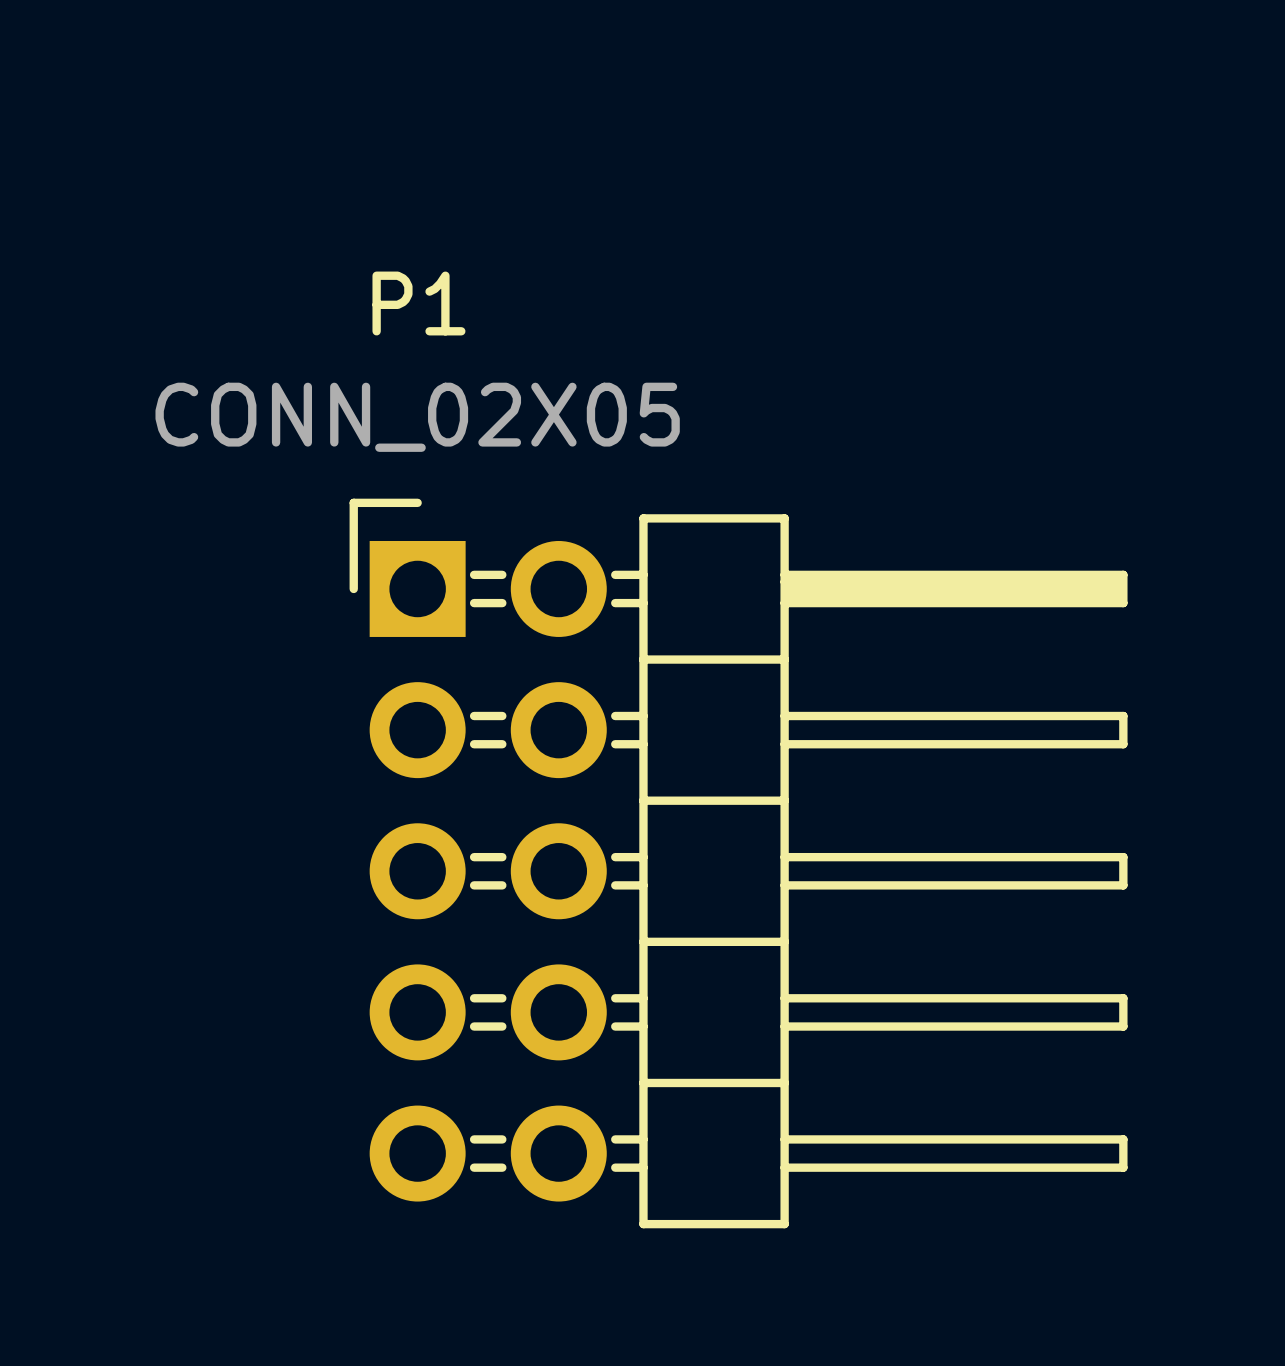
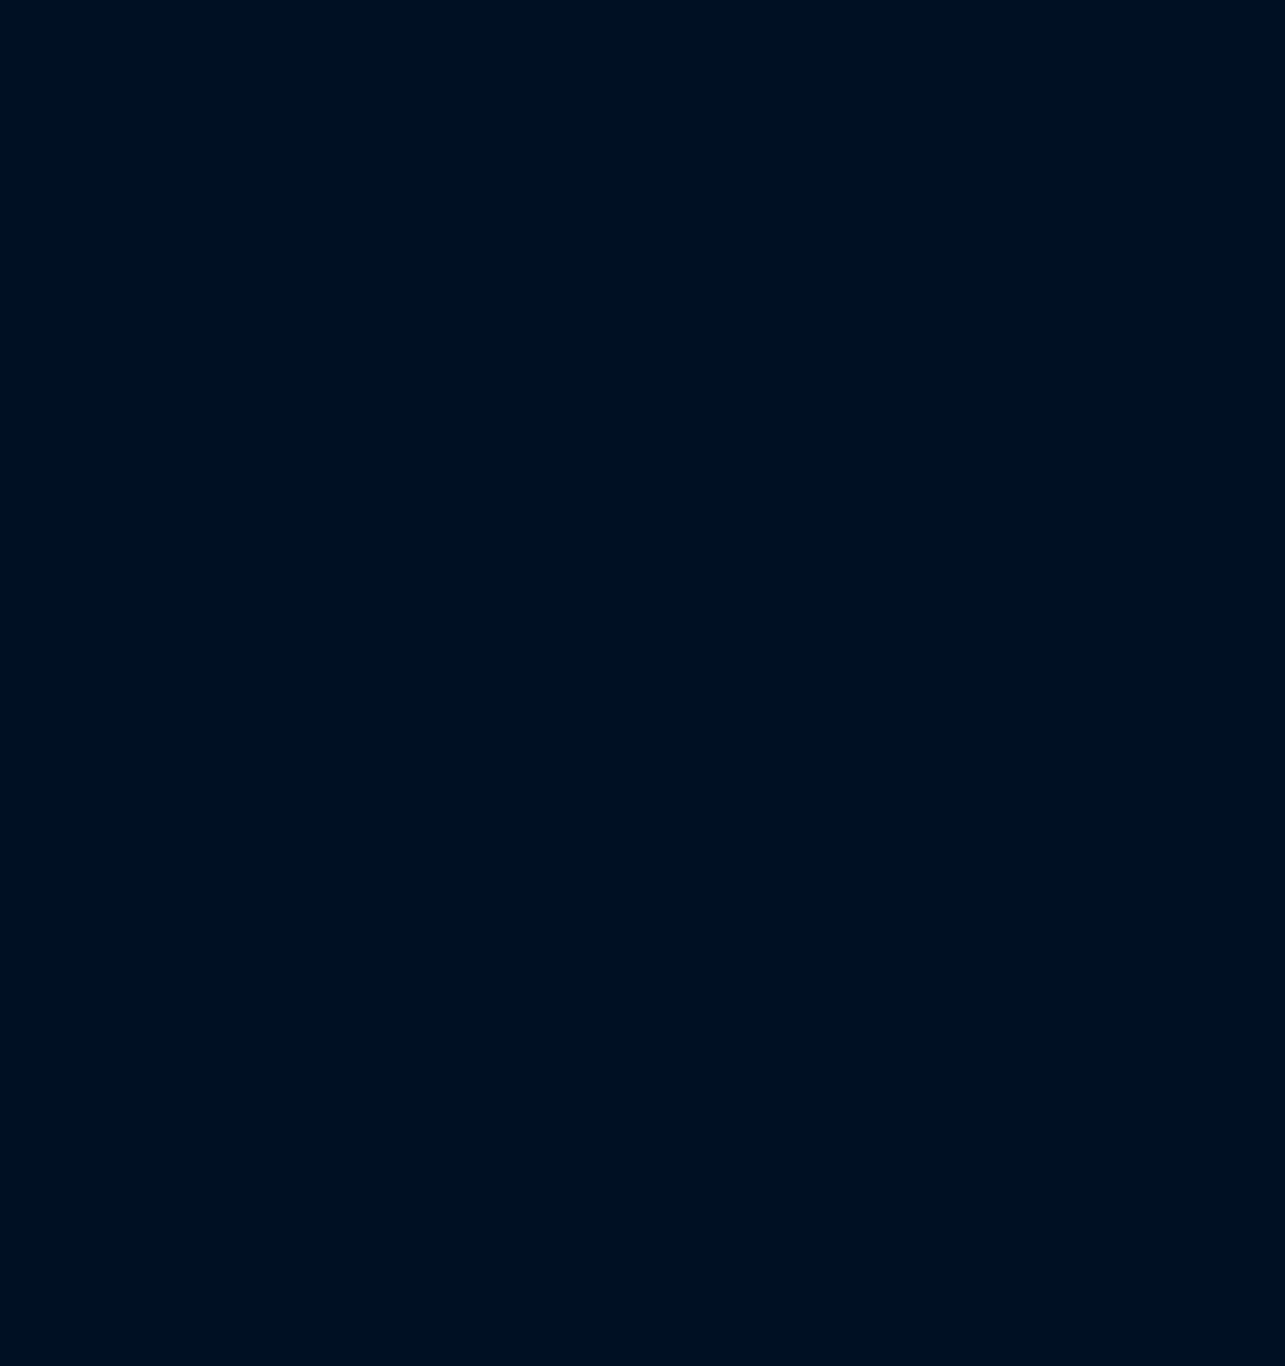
P1: CONN_02X05 (738, 863) -> none

